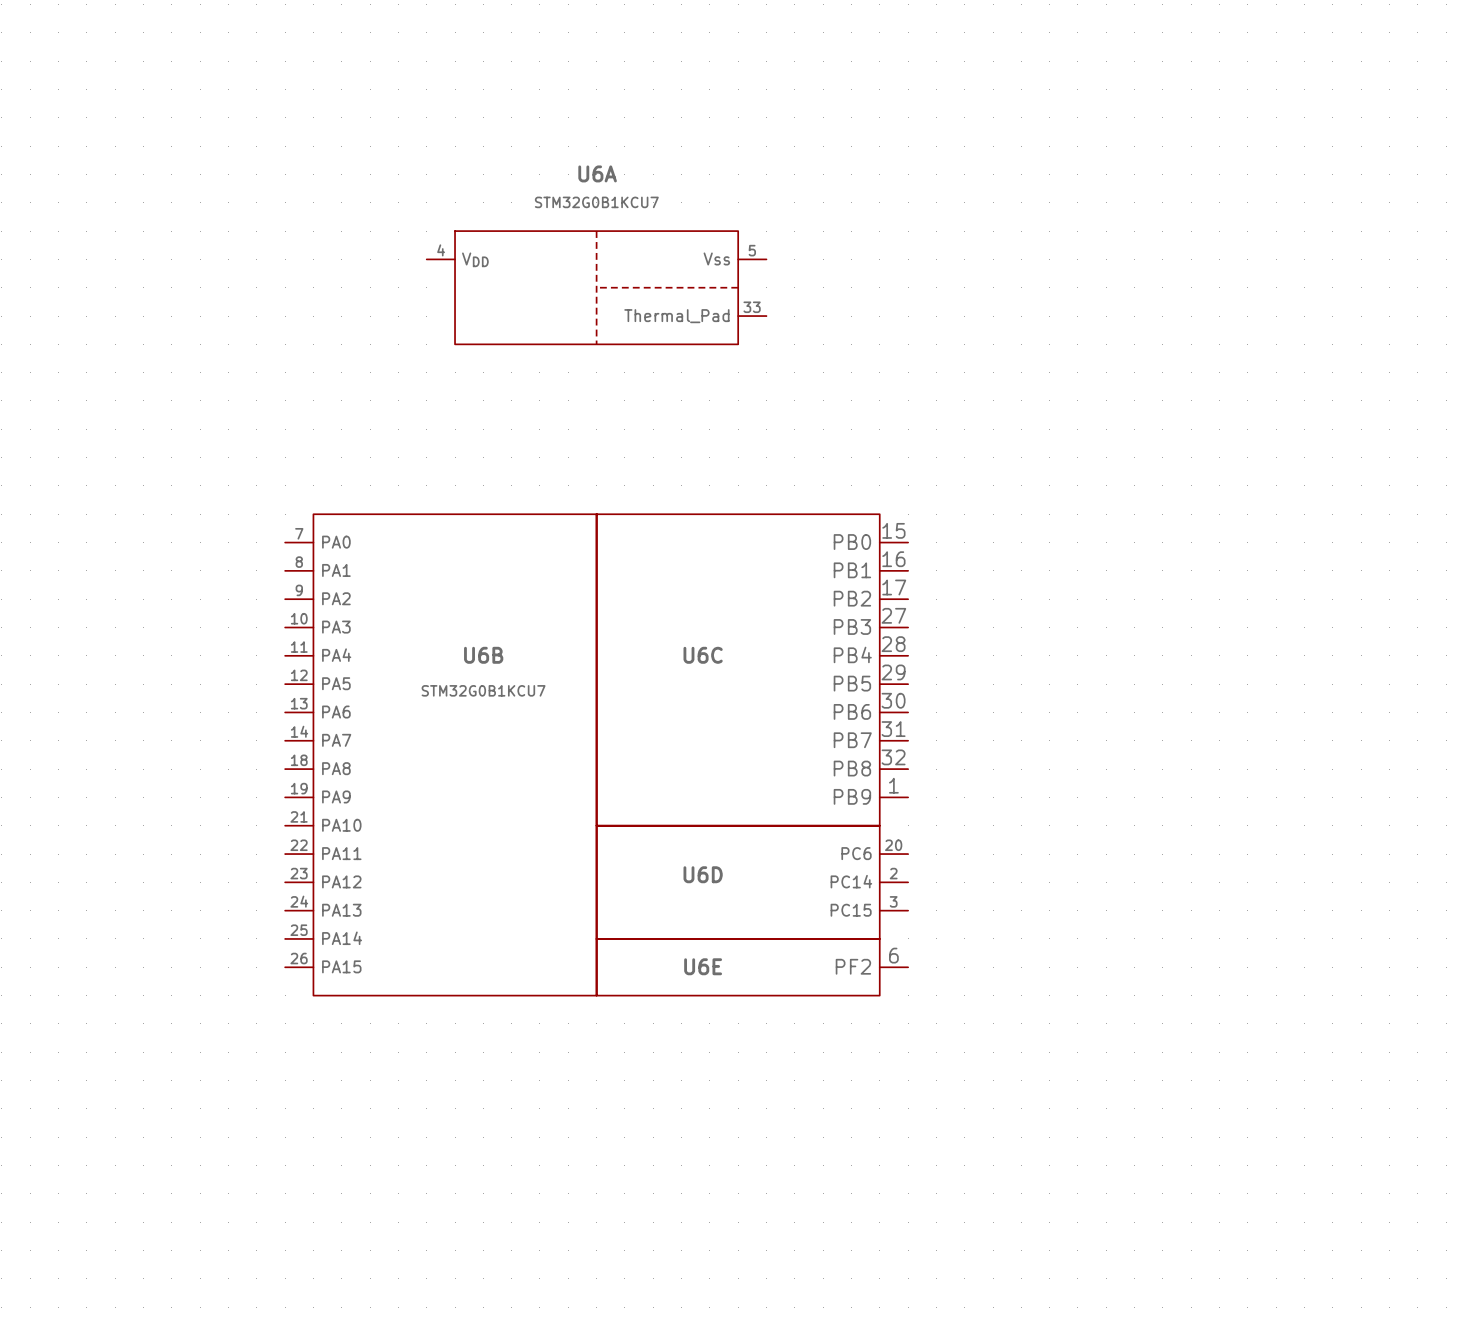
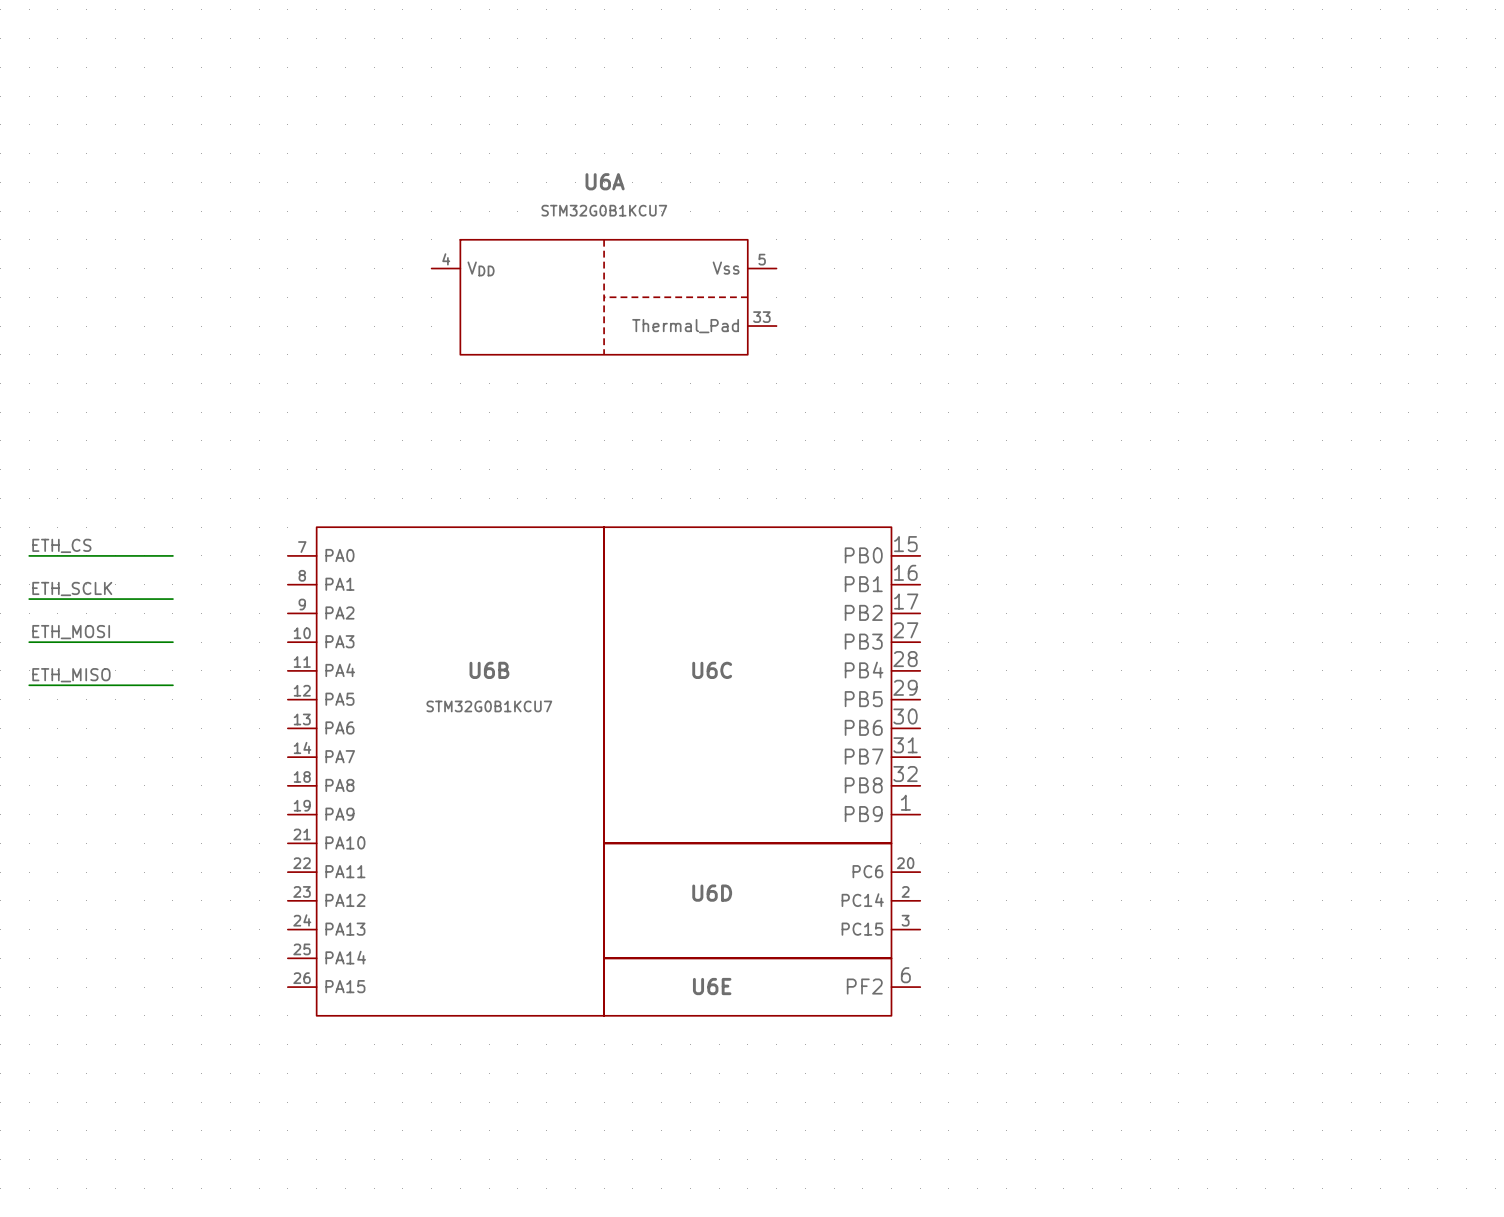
label: none -> ETH_CS (61, 545)
wire: none -> (29, 555) (172, 555)
label: none -> ETH_SCLK (72, 588)
wire: none -> (29, 599) (172, 599)
label: none -> ETH_MOSI (71, 632)
wire: none -> (29, 642) (172, 642)
label: none -> ETH_MISO (71, 675)
wire: none -> (29, 685) (172, 685)

